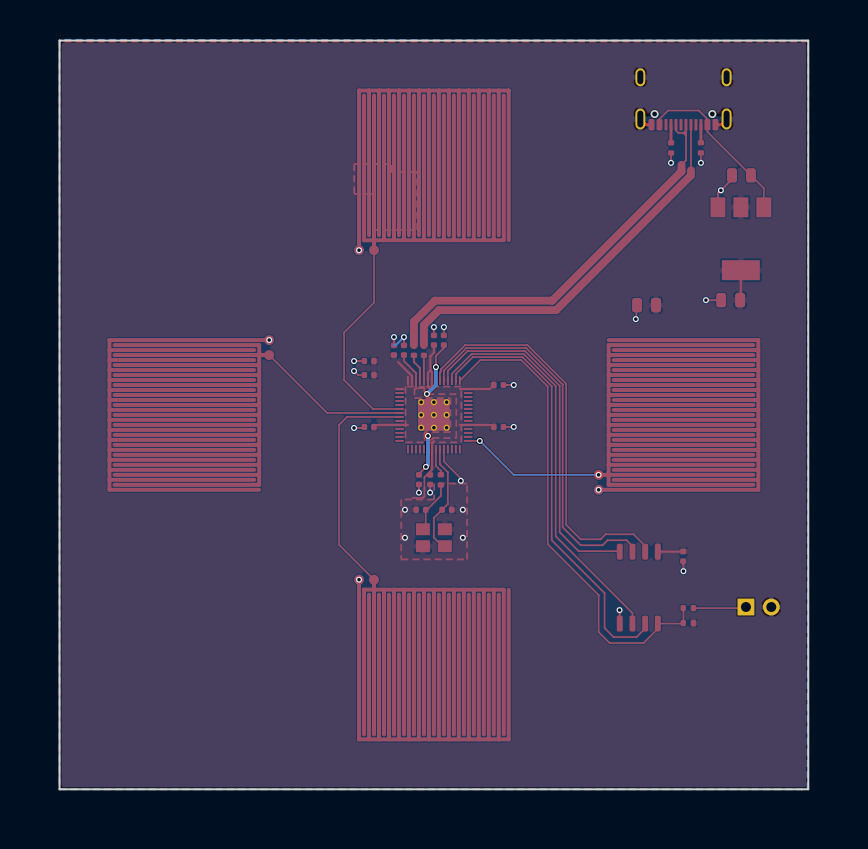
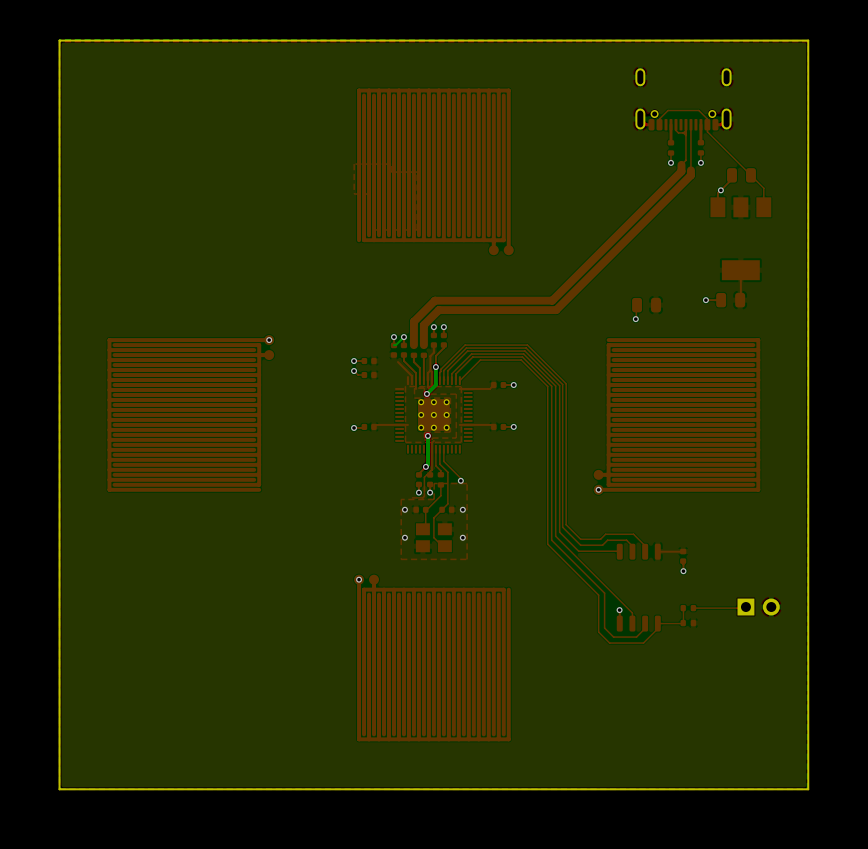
part footprint: [354, 88, 511, 256] -> [357, 88, 514, 256]
via: (359, 250) -> none
top track: (374, 250) (374, 302) (344, 332) (344, 380) (373, 408) (399, 408) -> none
top track: (269, 355) (327, 412) (399, 412) -> none
top track: (399, 416) (347, 416) (339, 424) (339, 544) (374, 579) -> none
top track: (479, 440) (468, 440) -> none
bottom track: (479, 440) (513, 474) (598, 474) -> none
via: (479, 440) -> none
via: (598, 474) -> none

